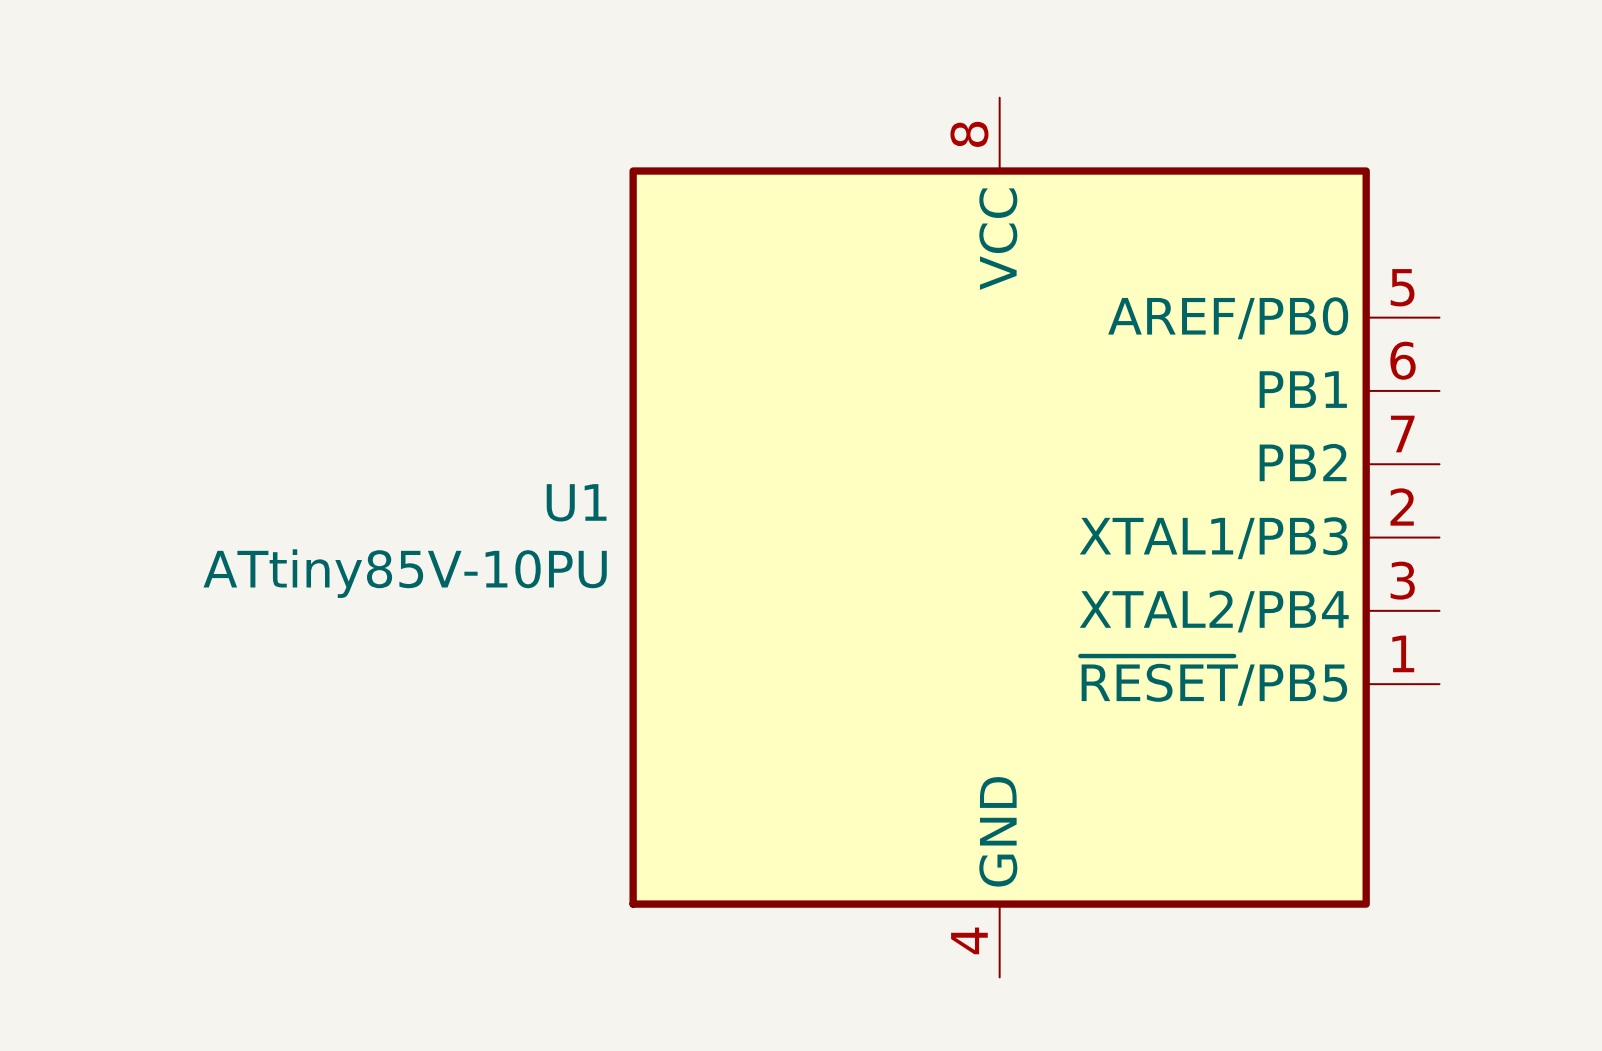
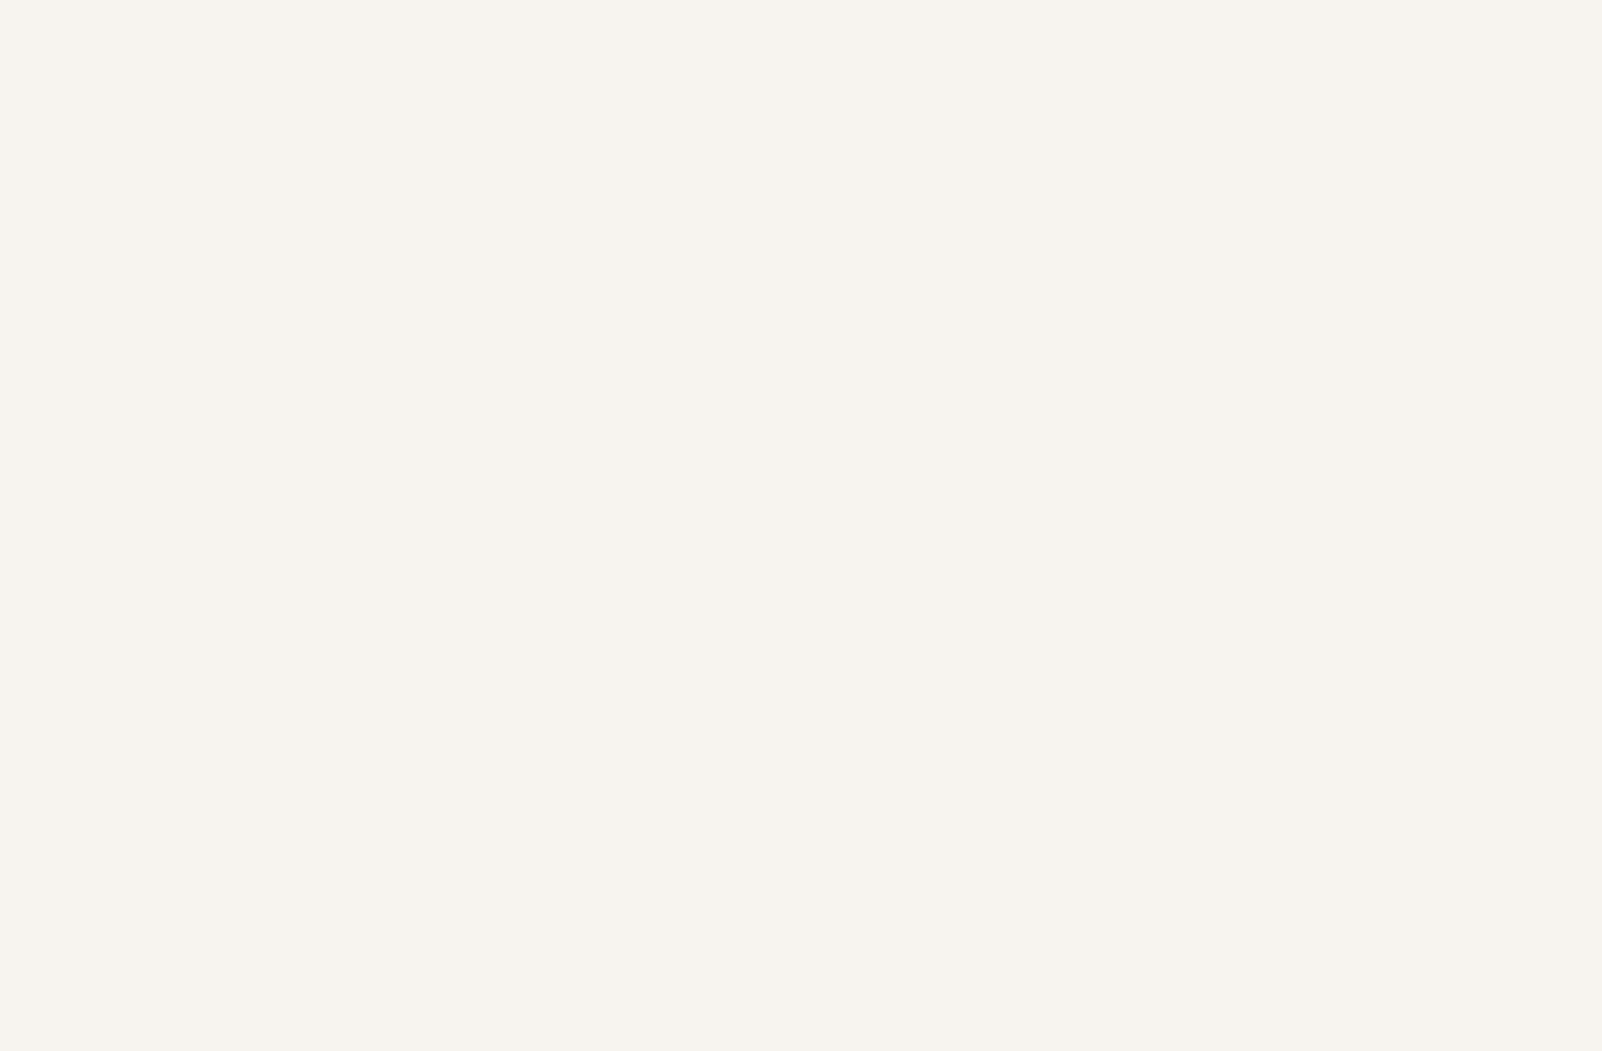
U1: ATtiny85V-10PU (1034, 537) -> none

